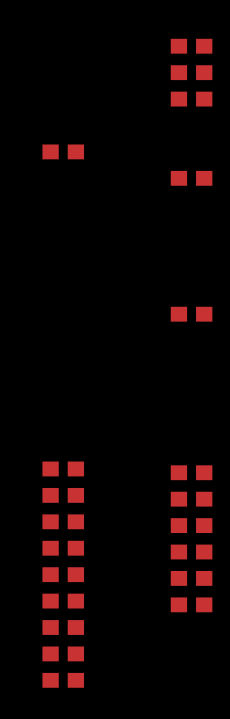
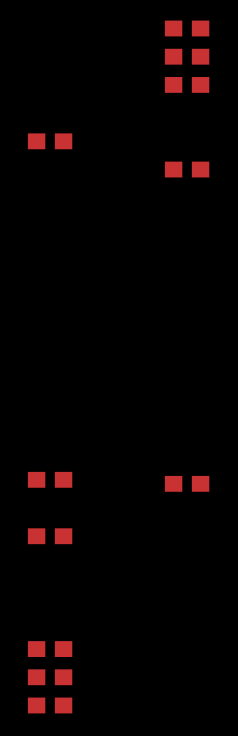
part: (191, 314) -> none
part: (63, 495) -> none
part: (191, 499) -> none
part: (191, 525) -> none
part: (63, 548) -> none
part: (191, 552) -> none
part: (63, 574) -> none
part: (191, 578) -> none
part: (63, 601) -> none
part: (191, 604) -> none

